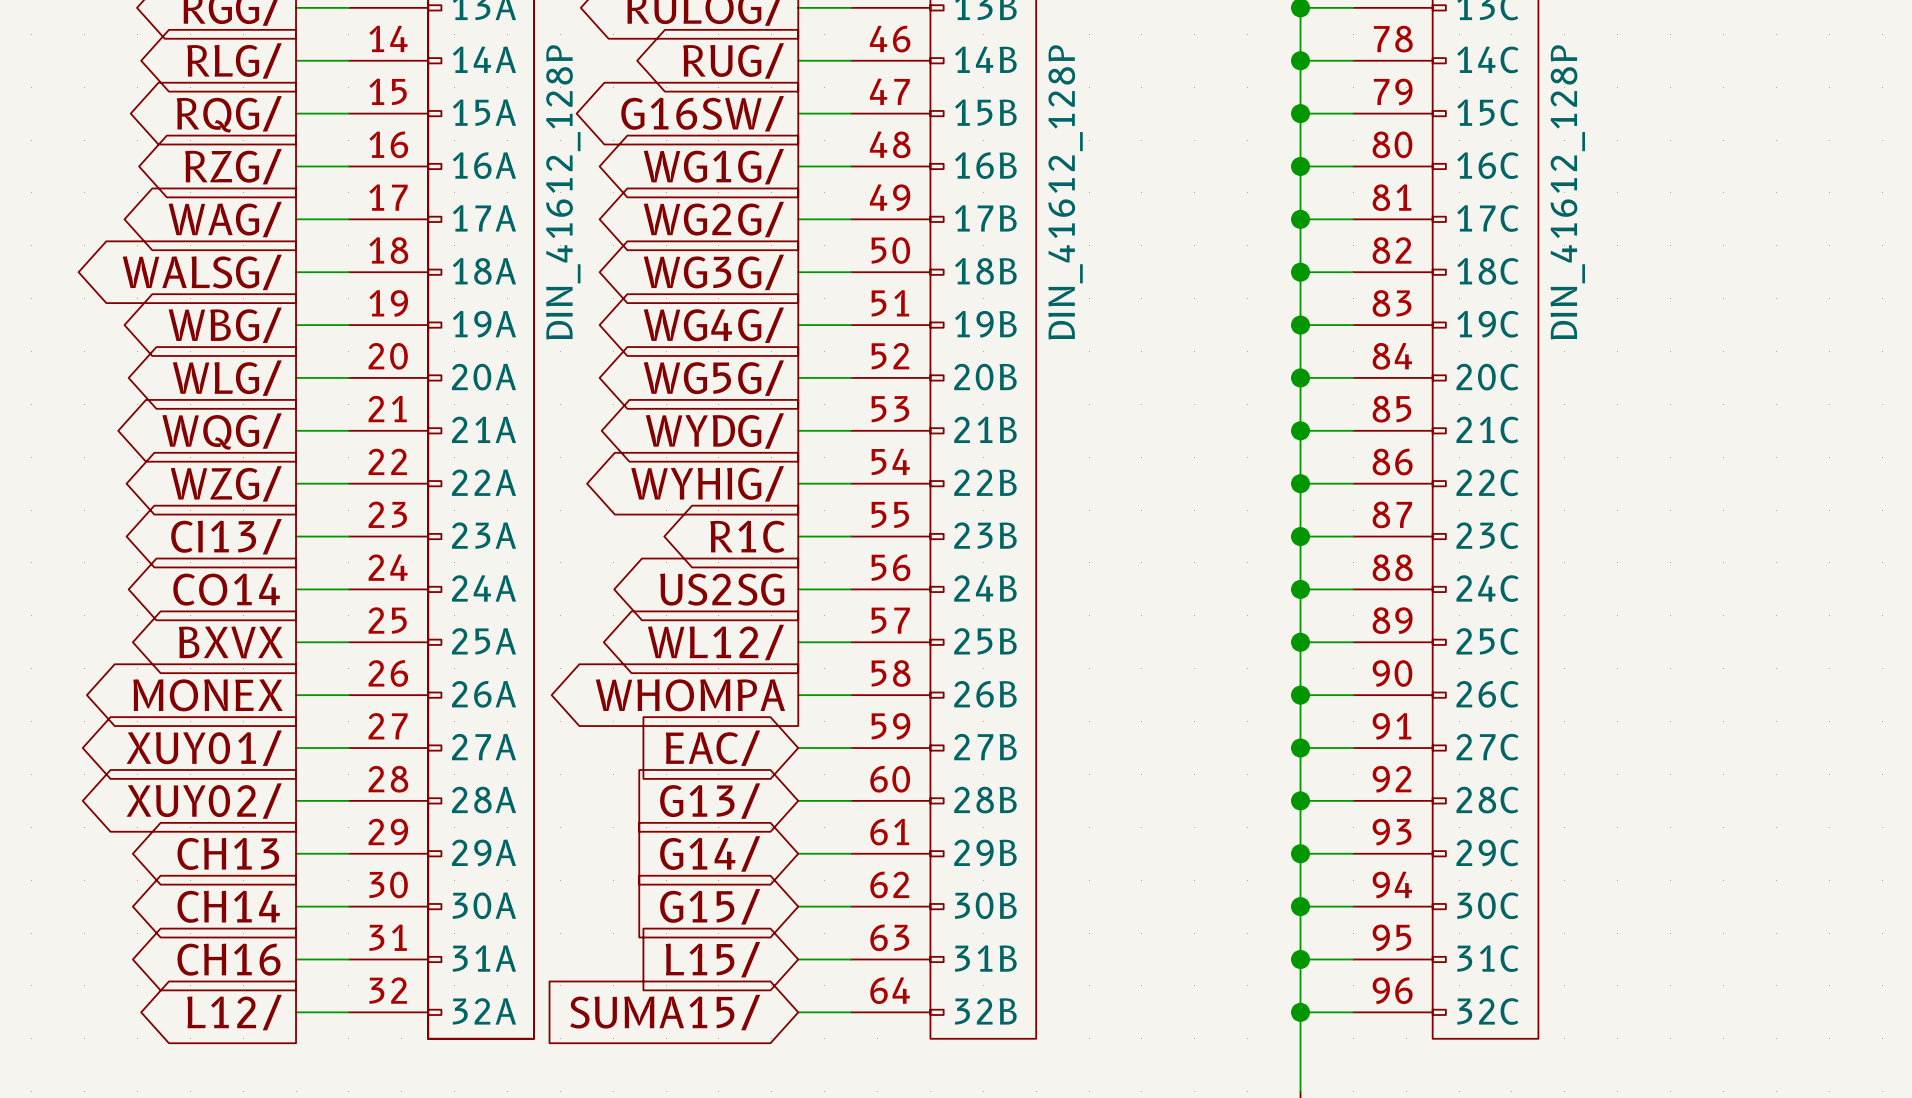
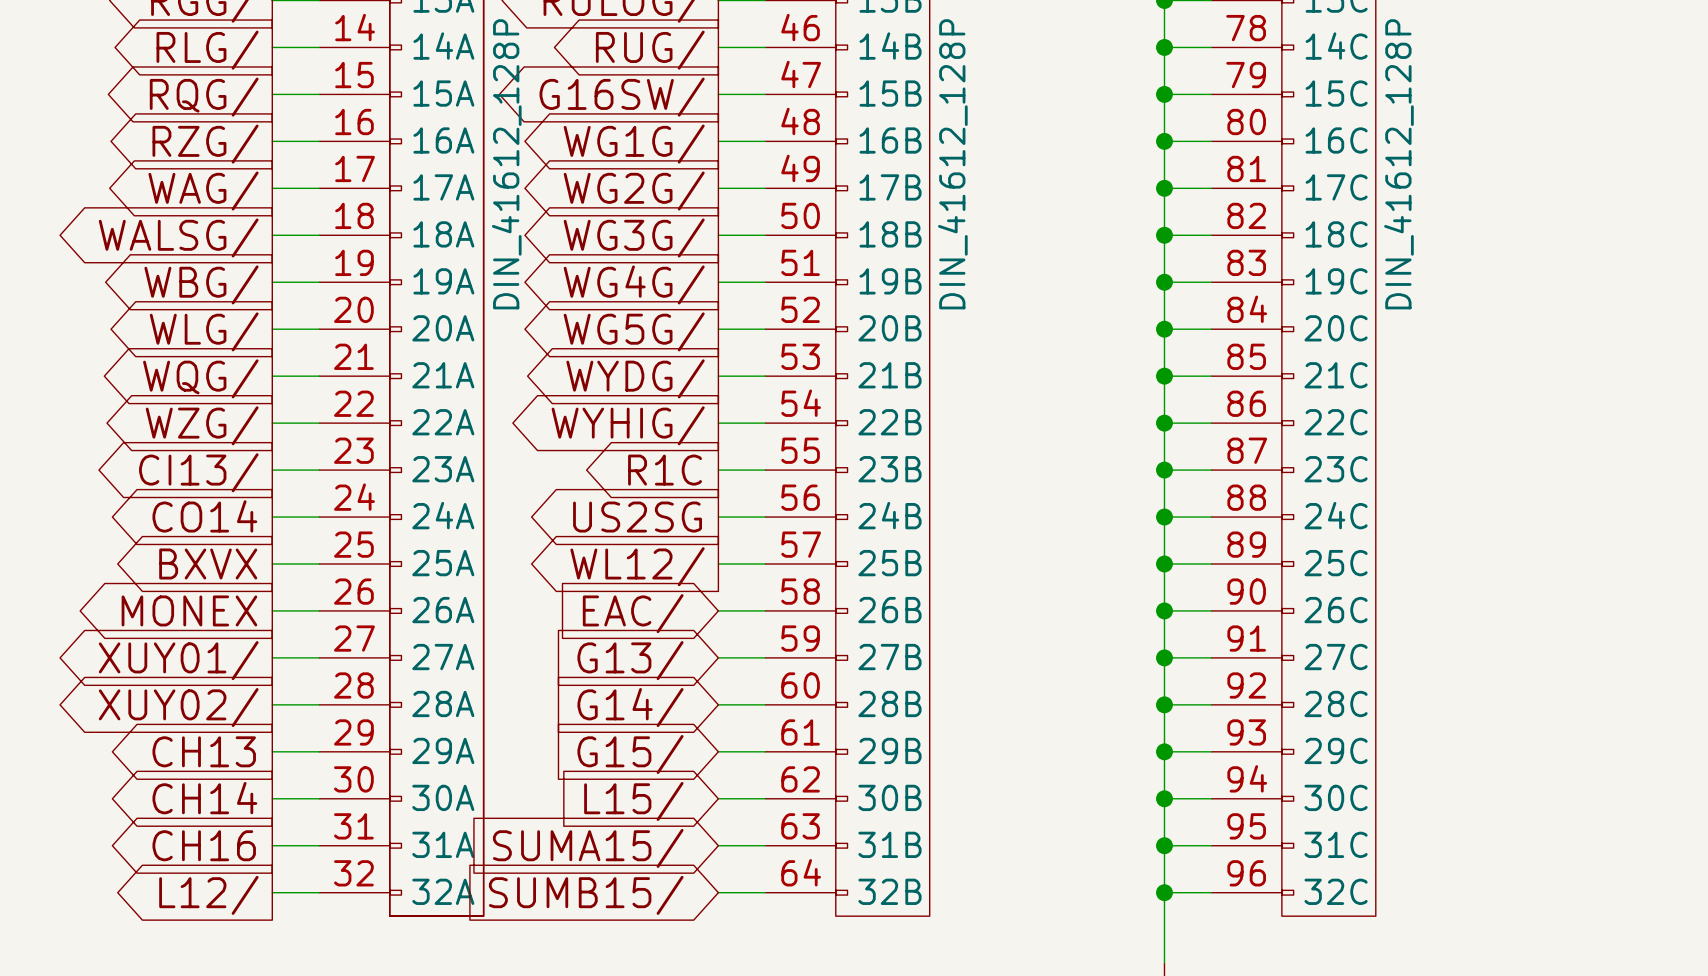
global label shape: output (690, 695) -> input (633, 613)
global label: WHOMPA (690, 695) -> EAC/ (633, 613)
global label: EAC/ (712, 748) -> G13/ (630, 660)
global label: G13/ (710, 801) -> G14/ (630, 707)
global label: G14/ (710, 853) -> G15/ (630, 754)
global label: G15/ (710, 906) -> L15/ (633, 801)
global label: L15/ (712, 959) -> SUMA15/ (588, 848)
global label: SUMA15/ (665, 1012) -> SUMB15/ (586, 895)

